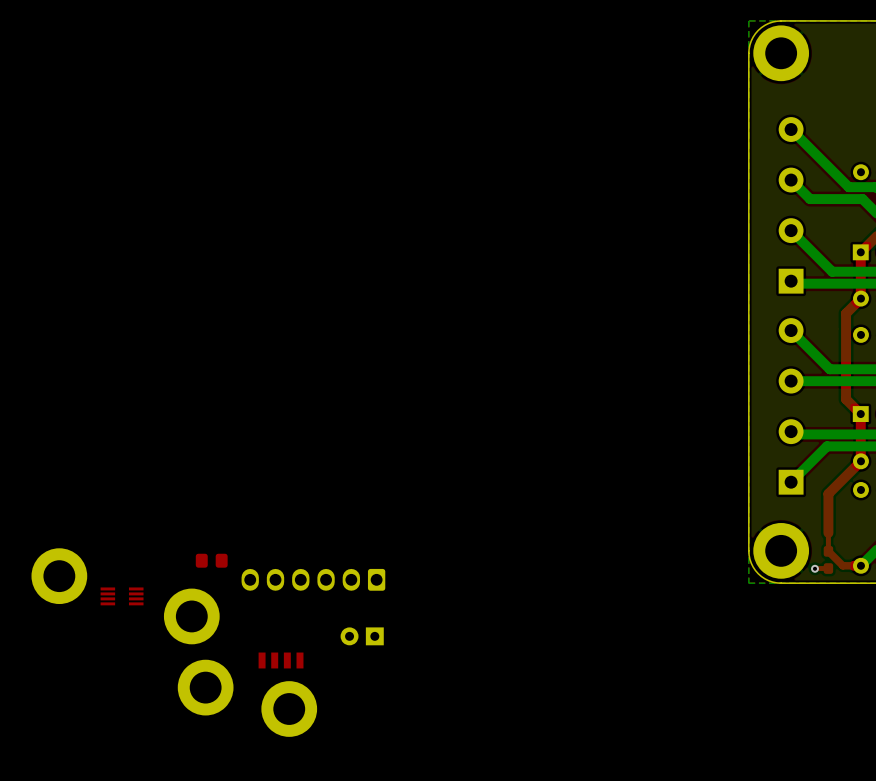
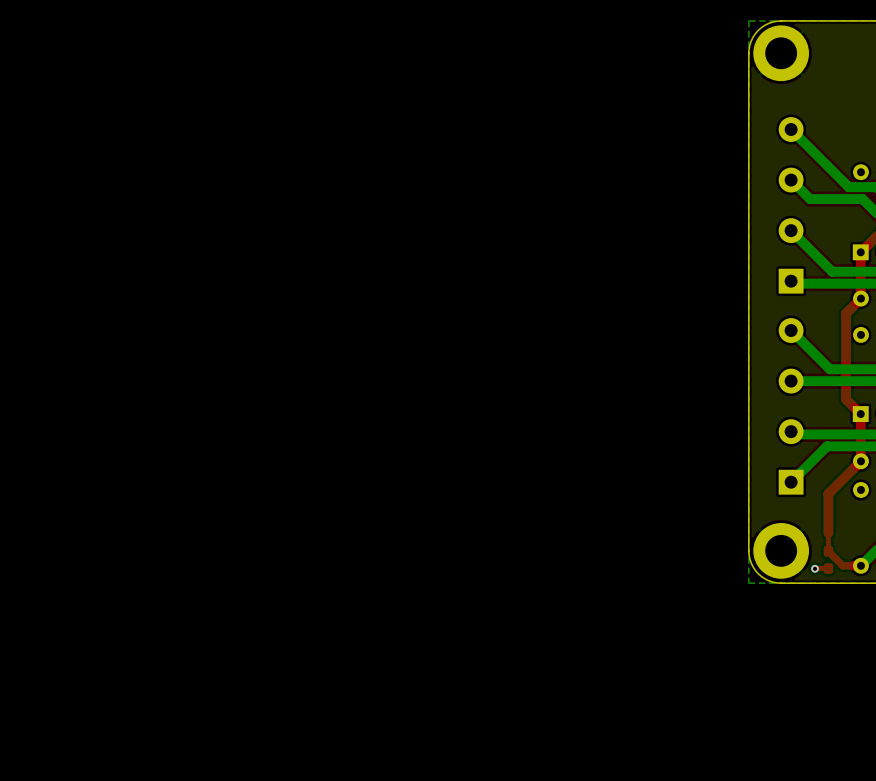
part: (211, 560) -> none
part: (59, 576) -> none
part: (313, 579) -> none
part: (122, 596) -> none
part: (191, 616) -> none
part: (362, 636) -> none
part: (281, 660) -> none
part: (205, 687) -> none
part: (289, 709) -> none

